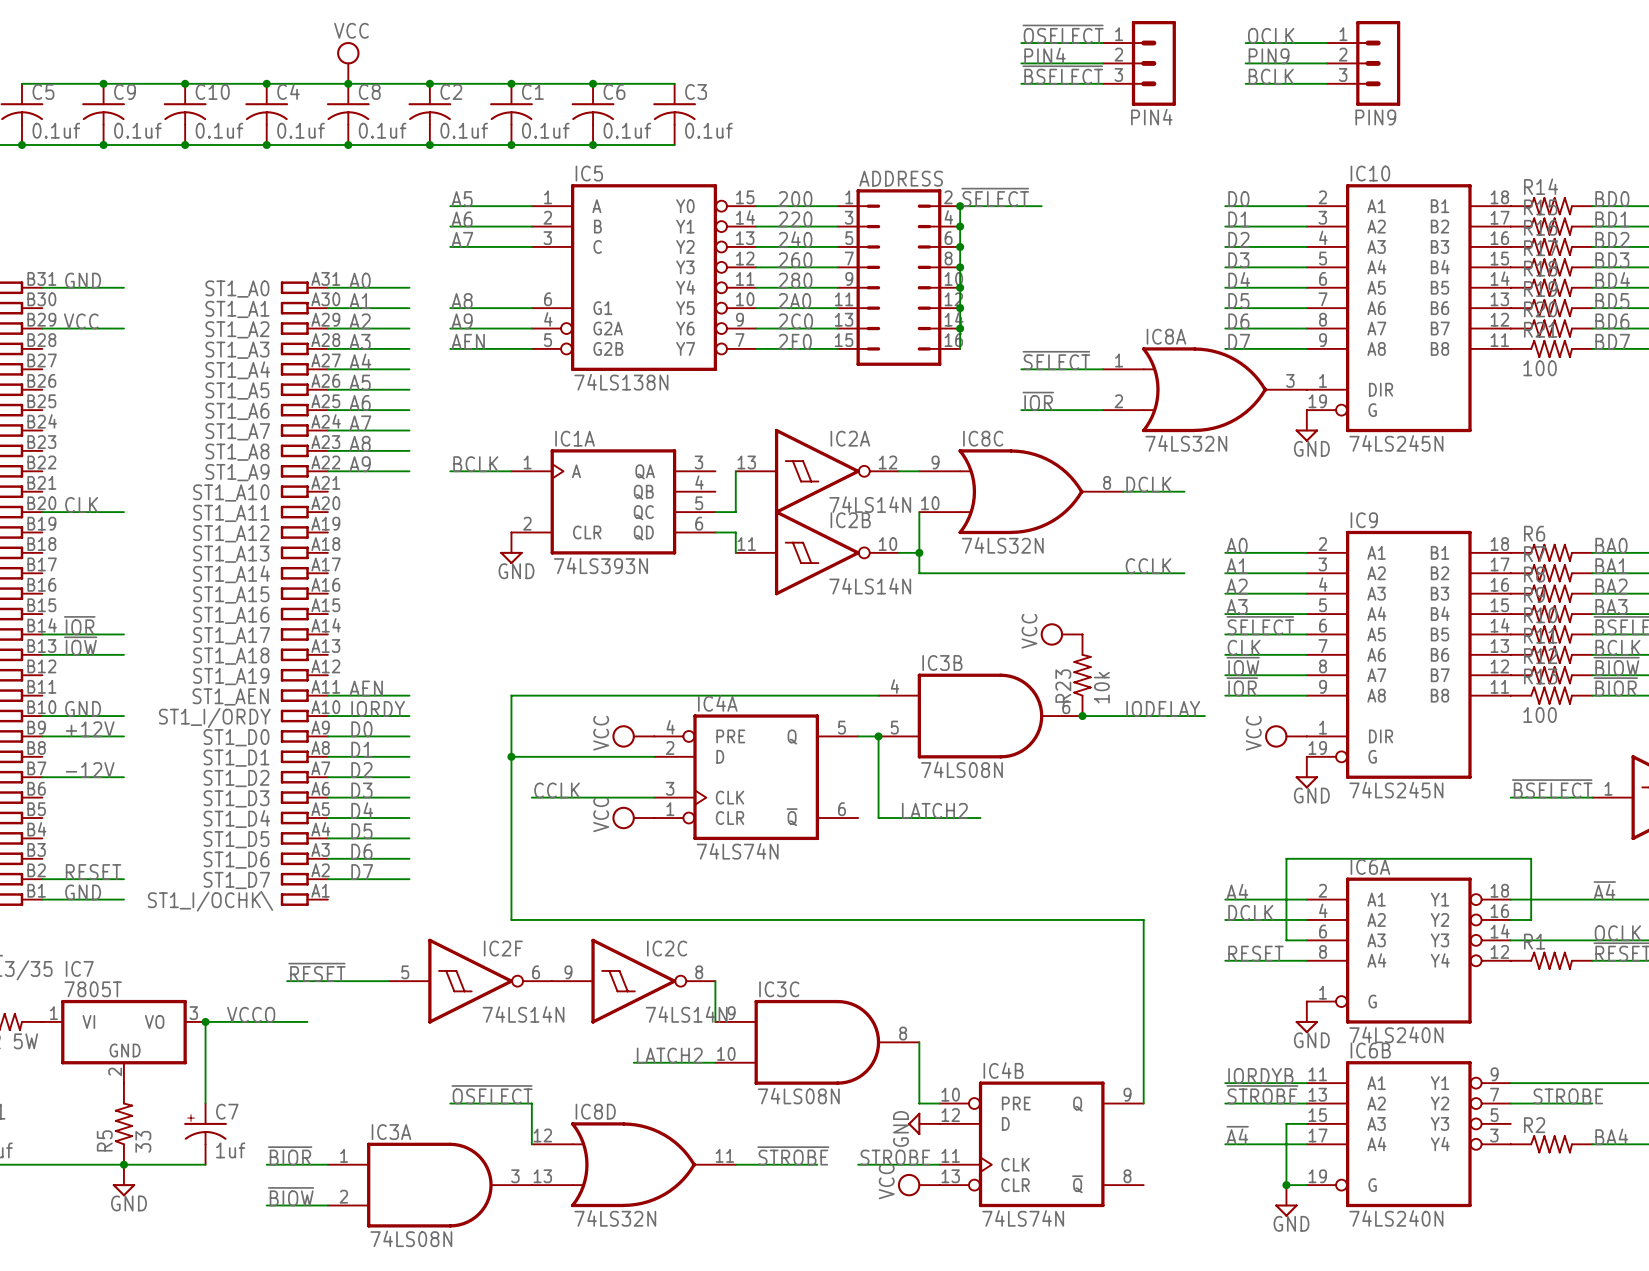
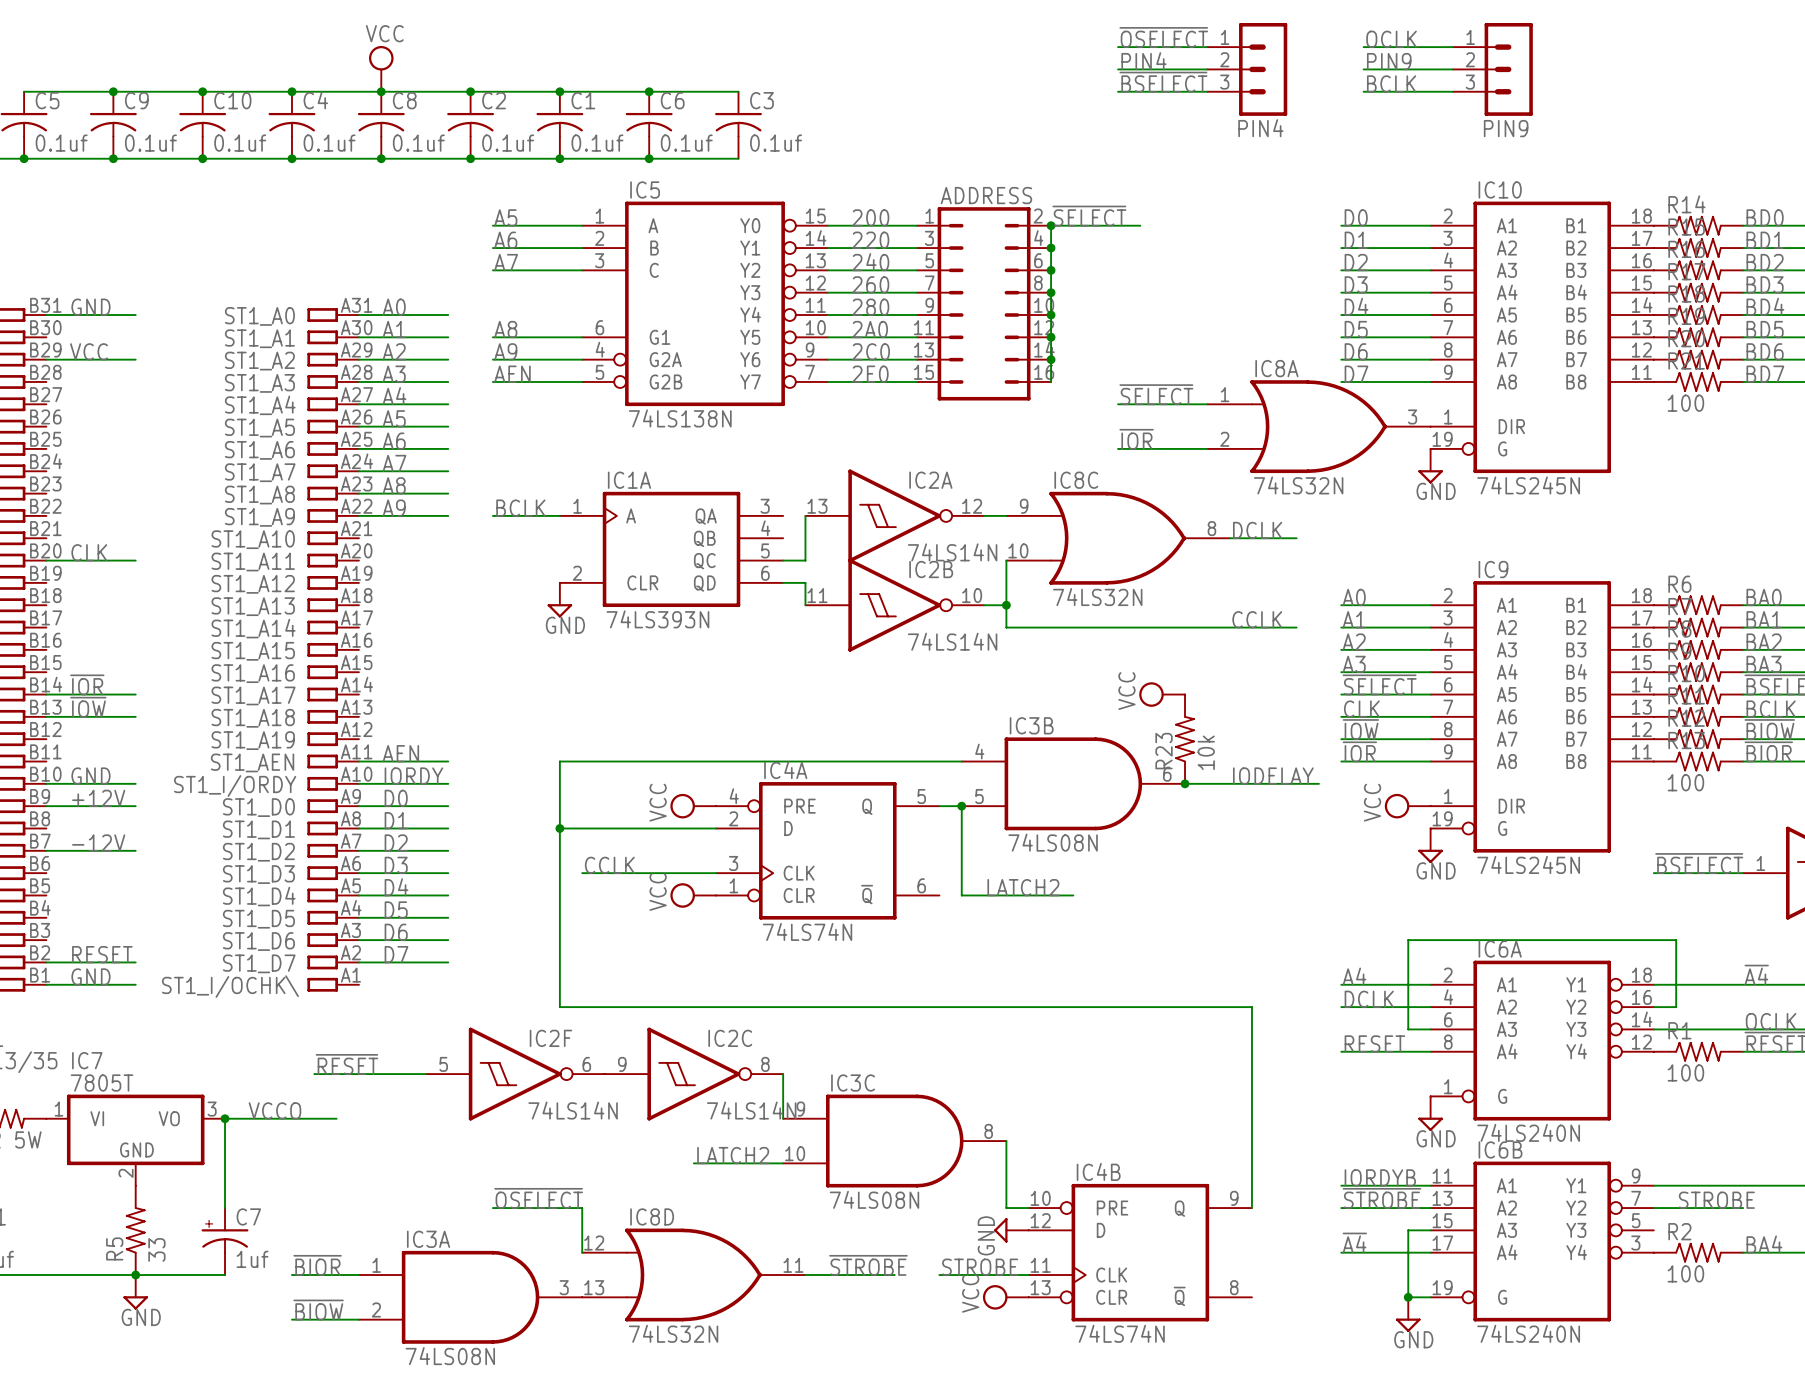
R1 value: none -> 100 (1685, 1072)
R2 value: none -> 100 (1685, 1273)

